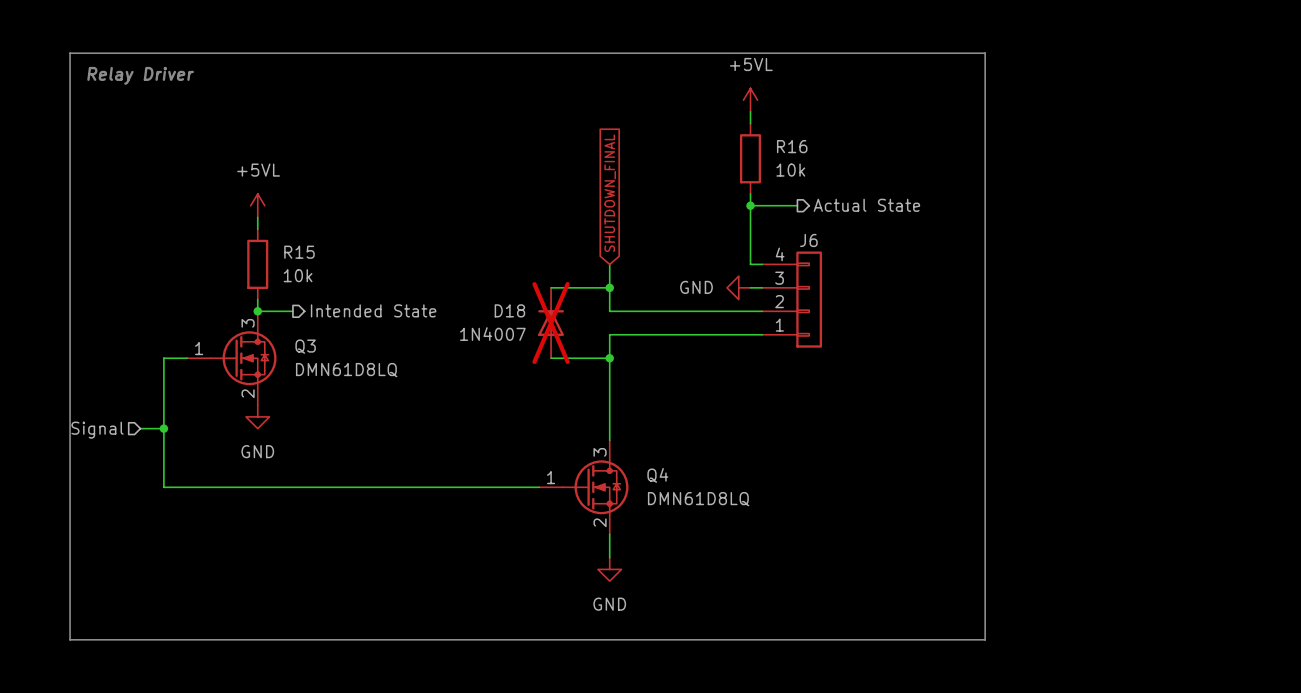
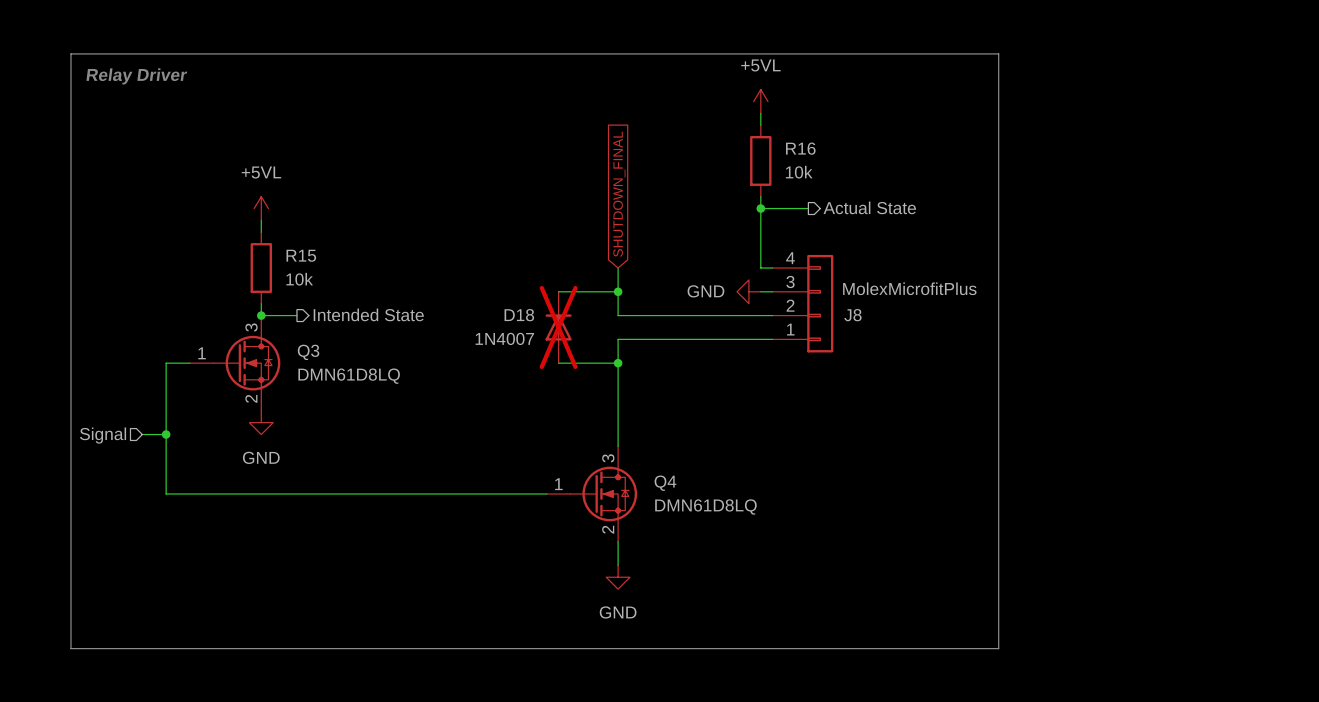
J6 name: J6 (808, 240) -> J8 (852, 315)
J6 value: none -> MolexMicrofitPlus (909, 288)

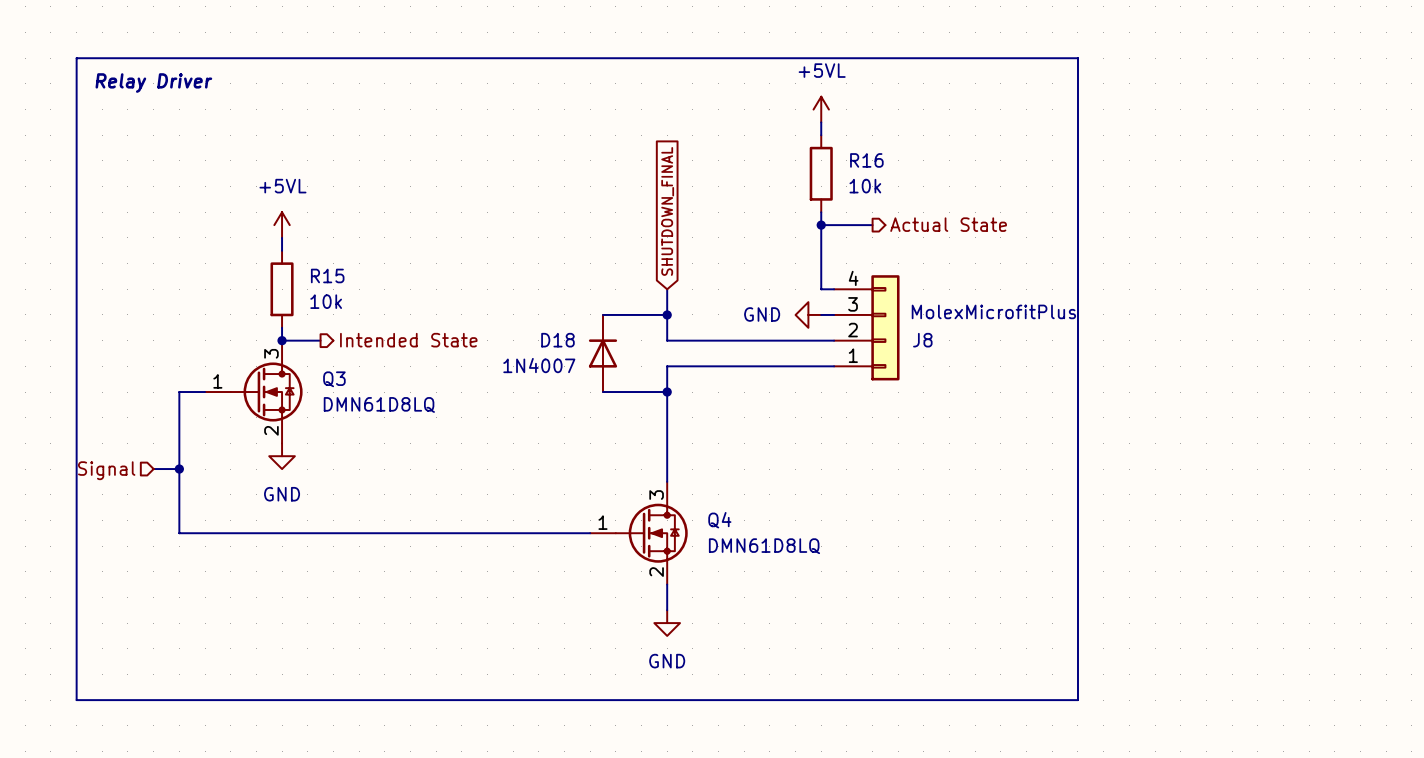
D18 do-not-place cross: (558, 327) -> none

